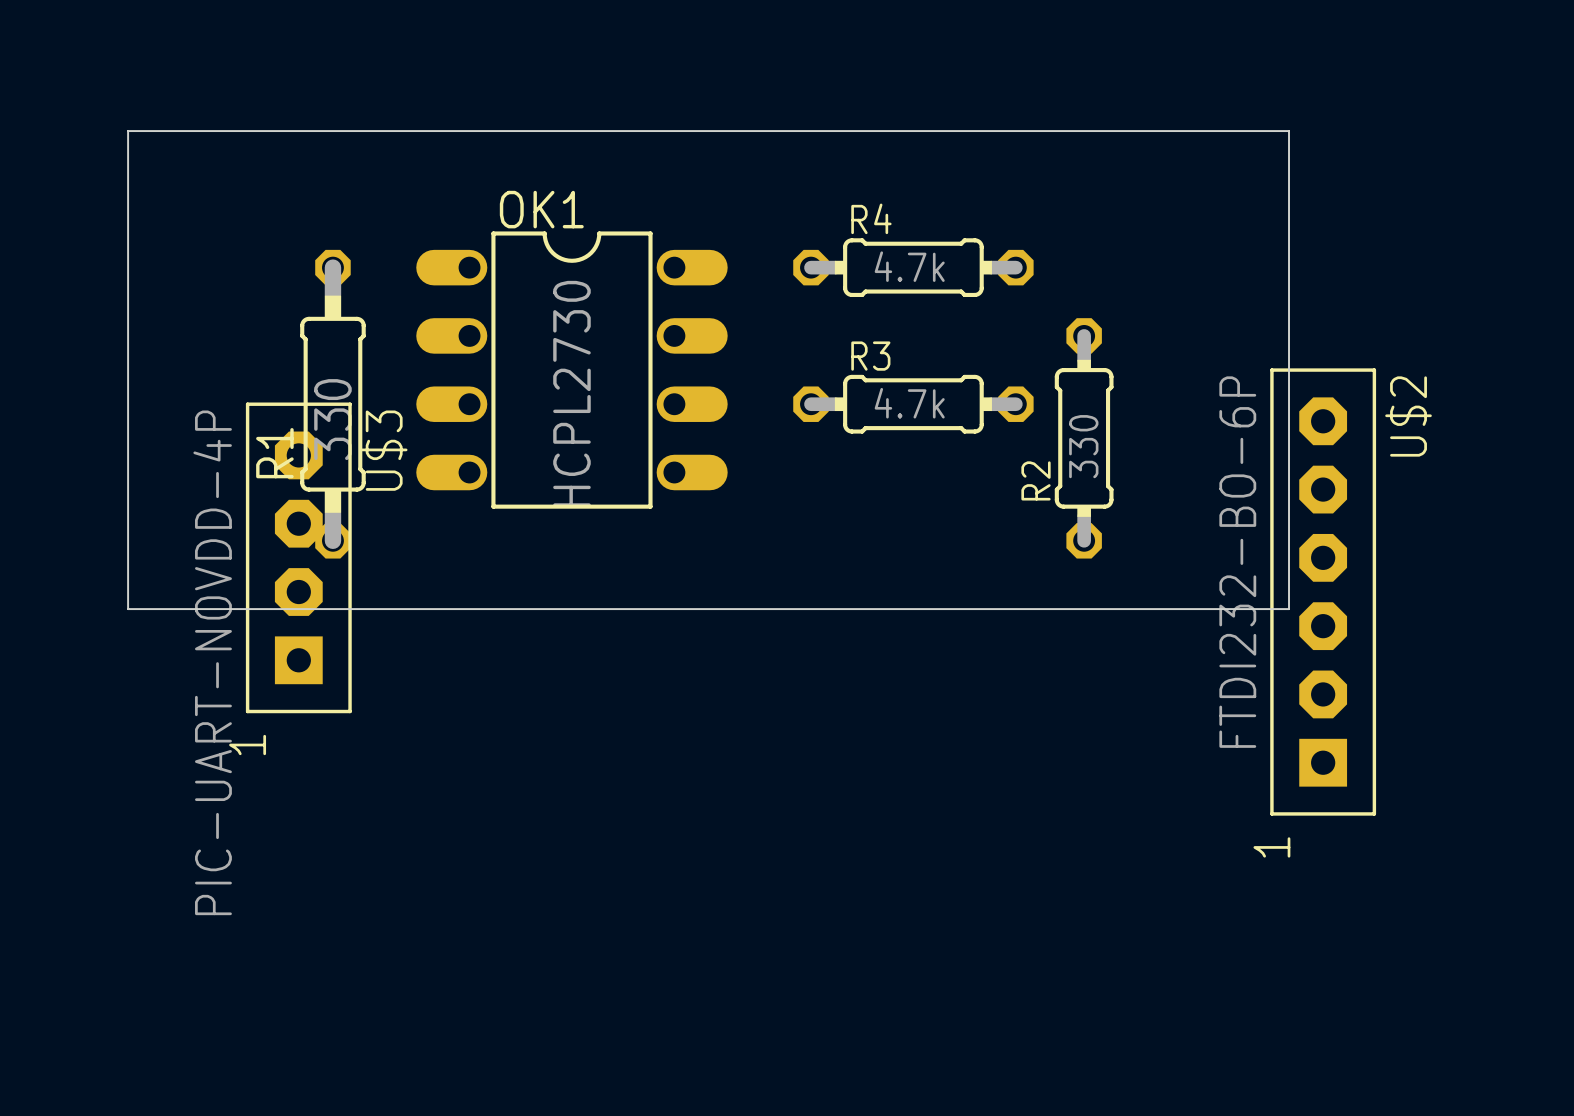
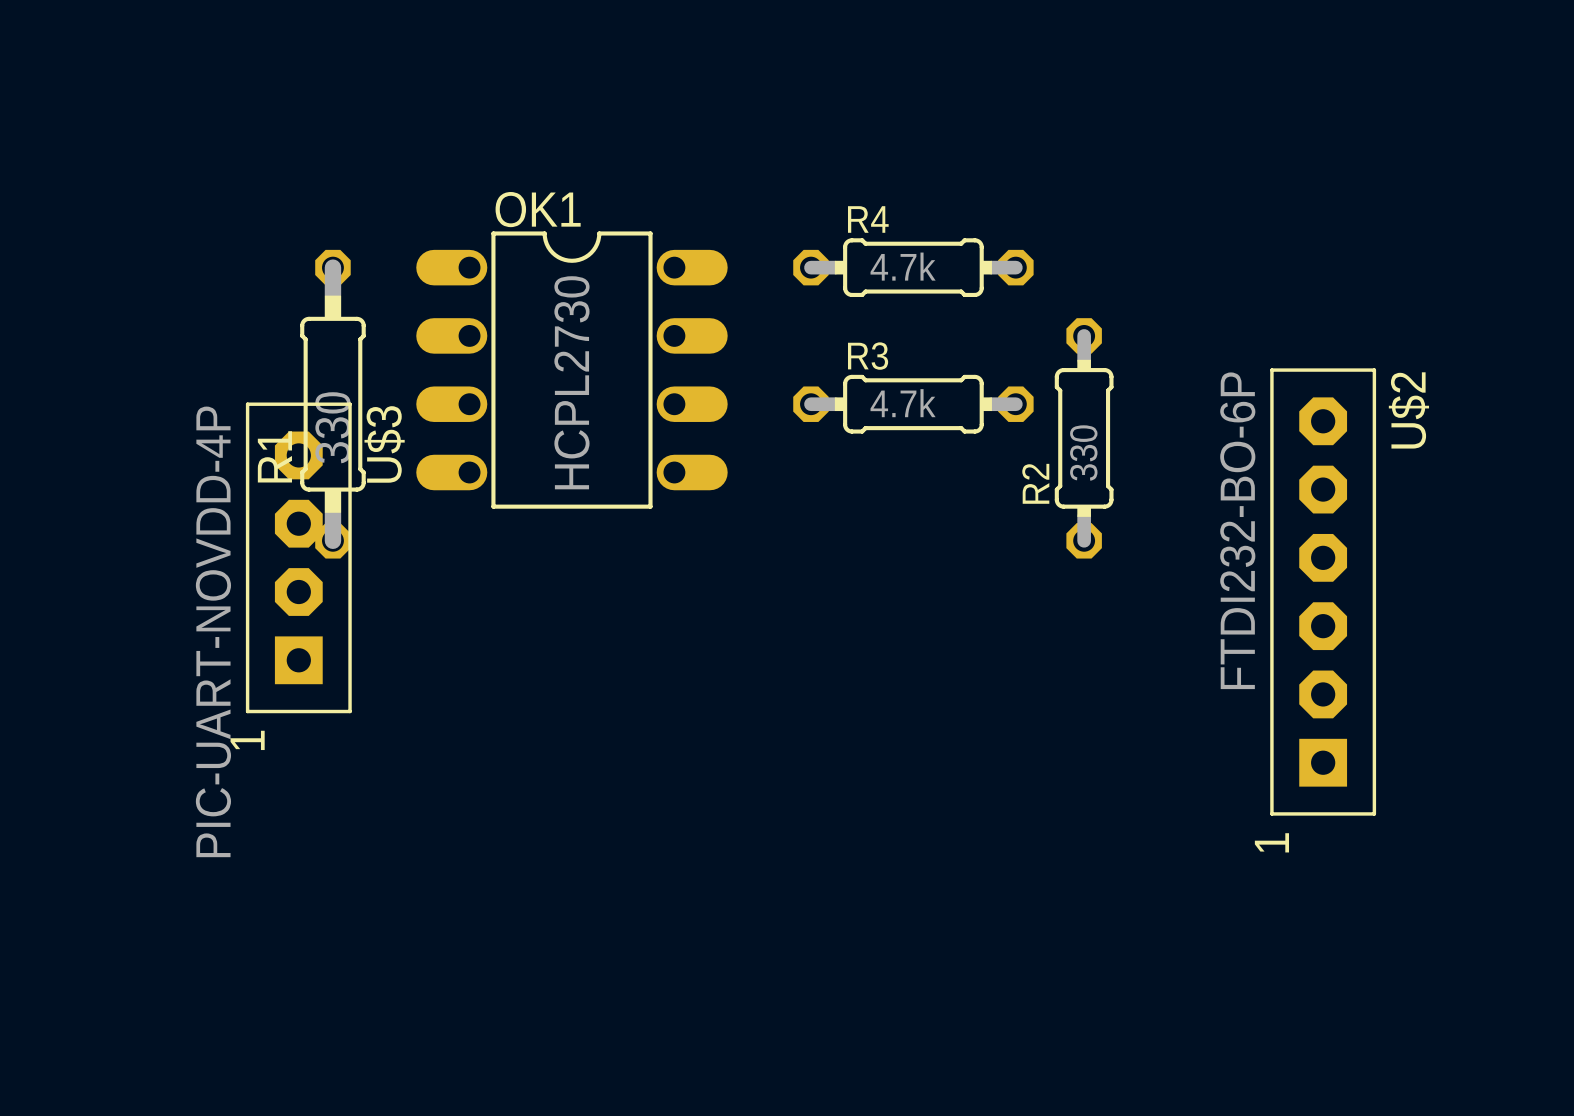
board edge: (128, 131) (1289, 131) (1289, 609) (128, 609) (128, 131) -> none

